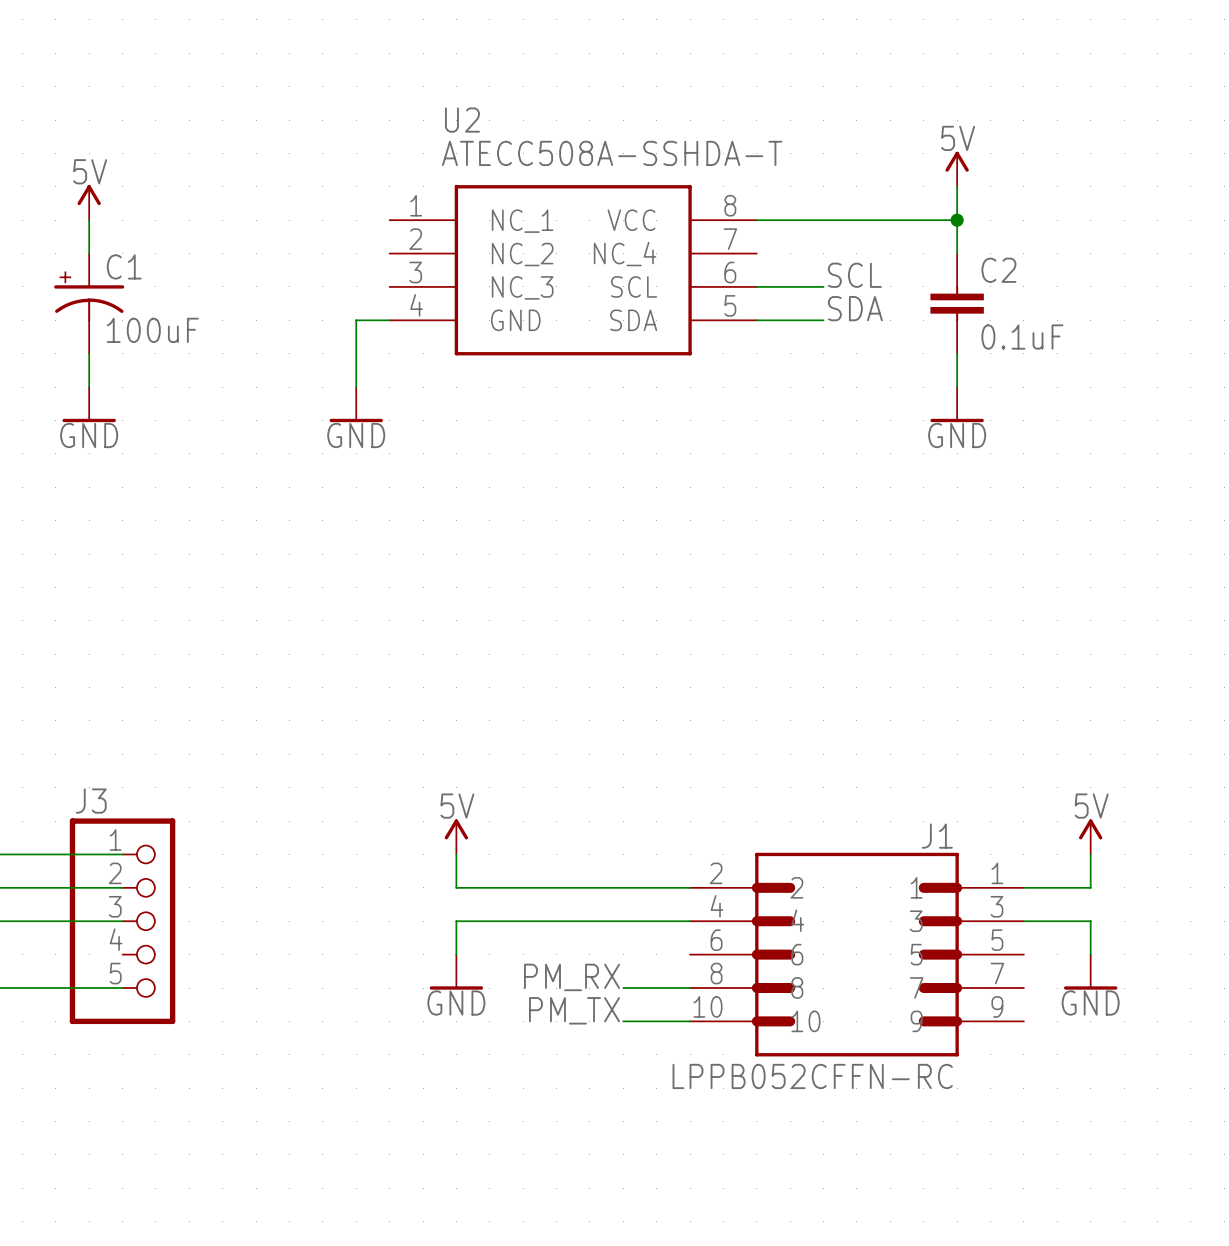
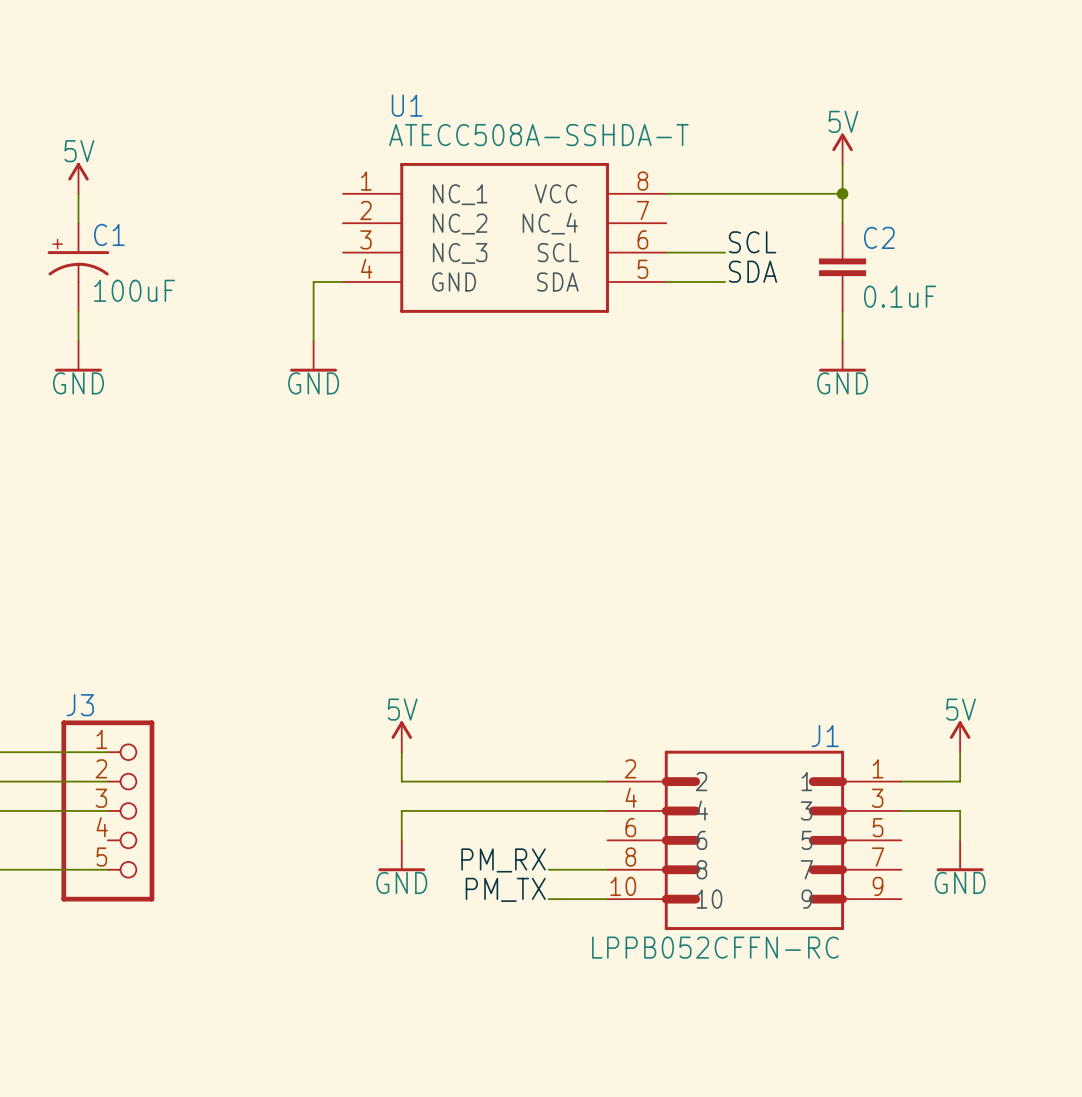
U2 name: U2 (462, 120) -> U1 (407, 105)

